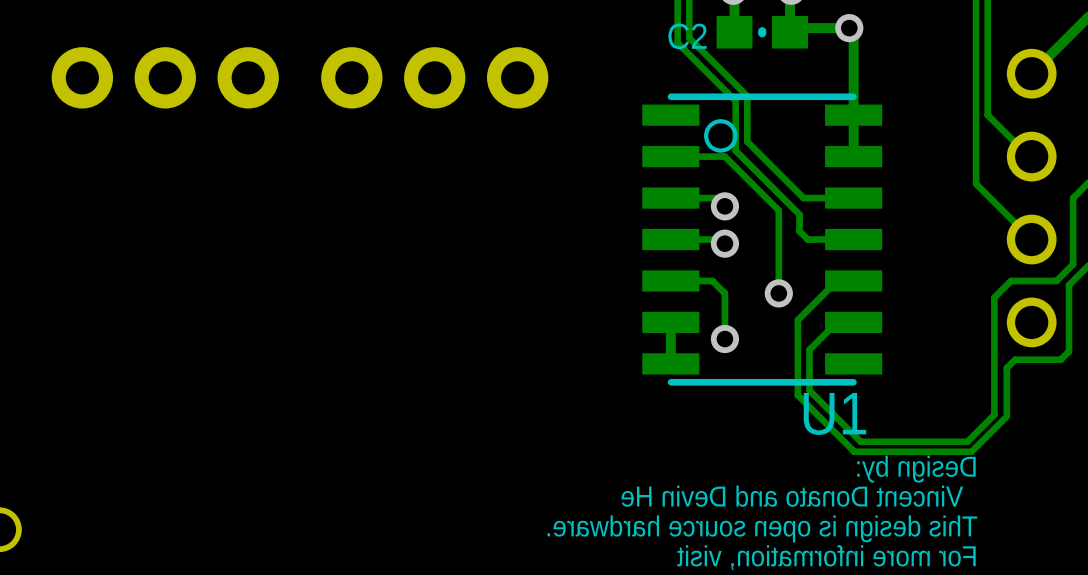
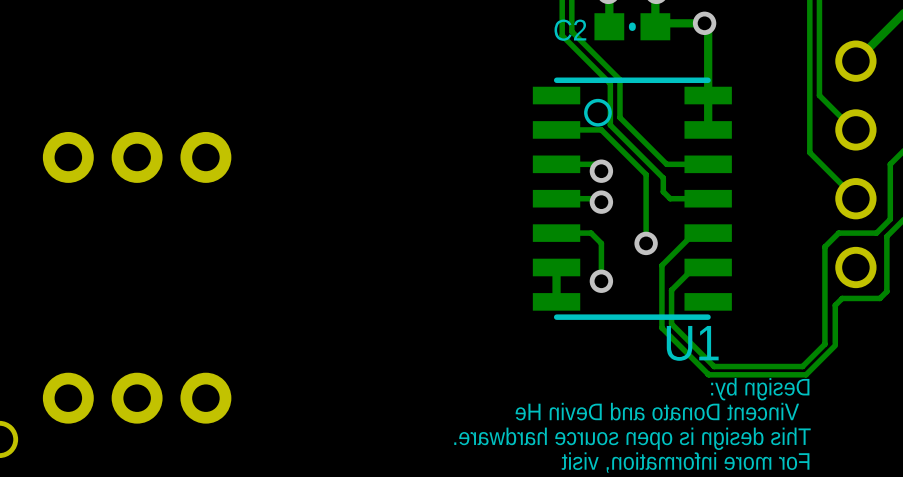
part position: (165, 77) -> (137, 157)
part: (434, 77) -> none
part: none -> (137, 398)

